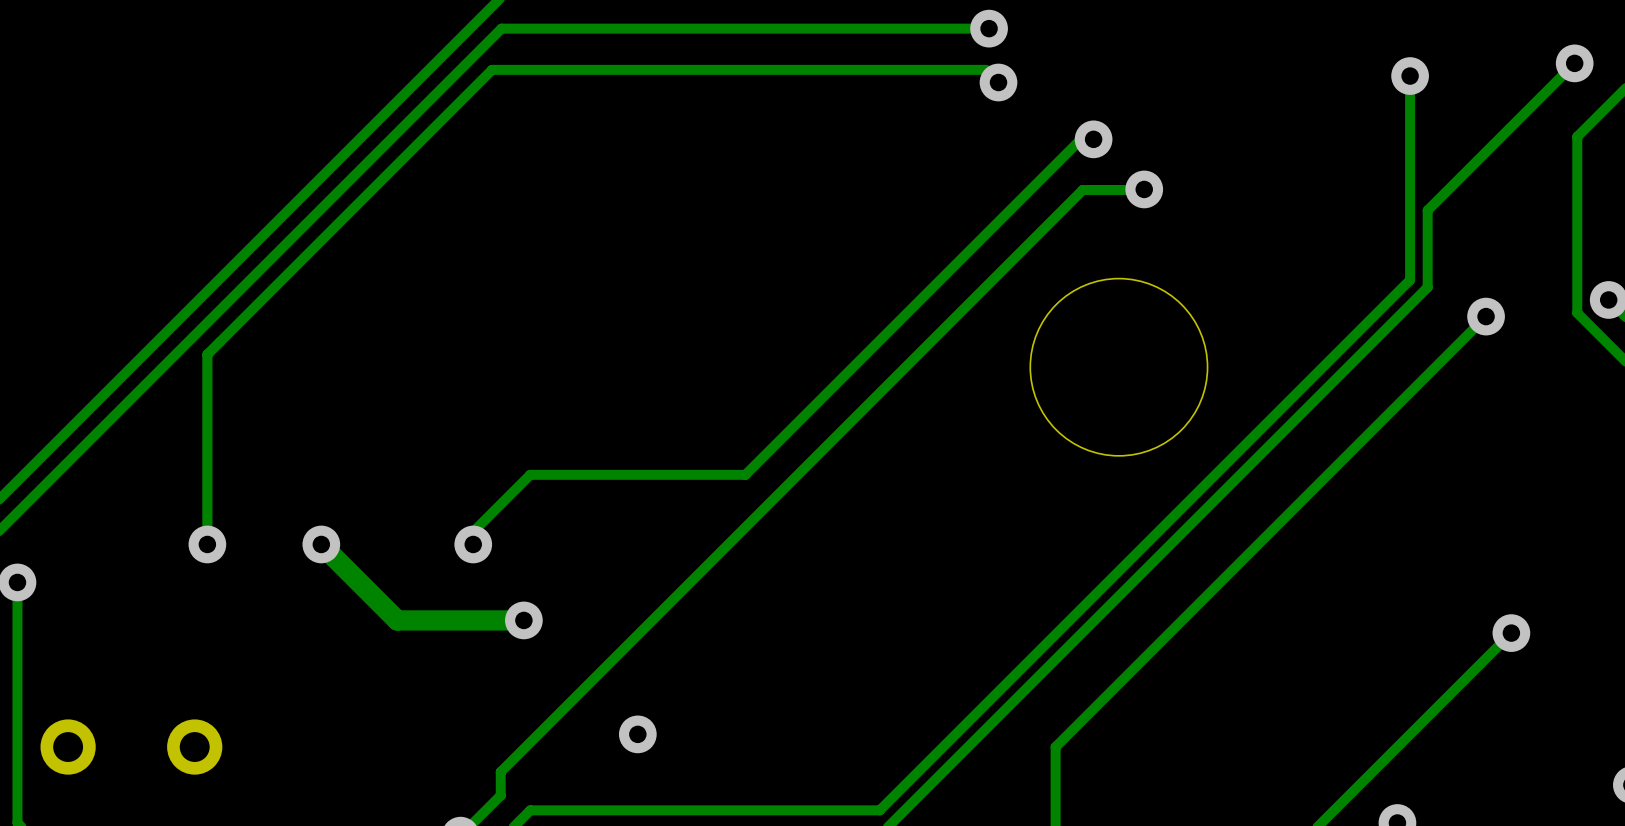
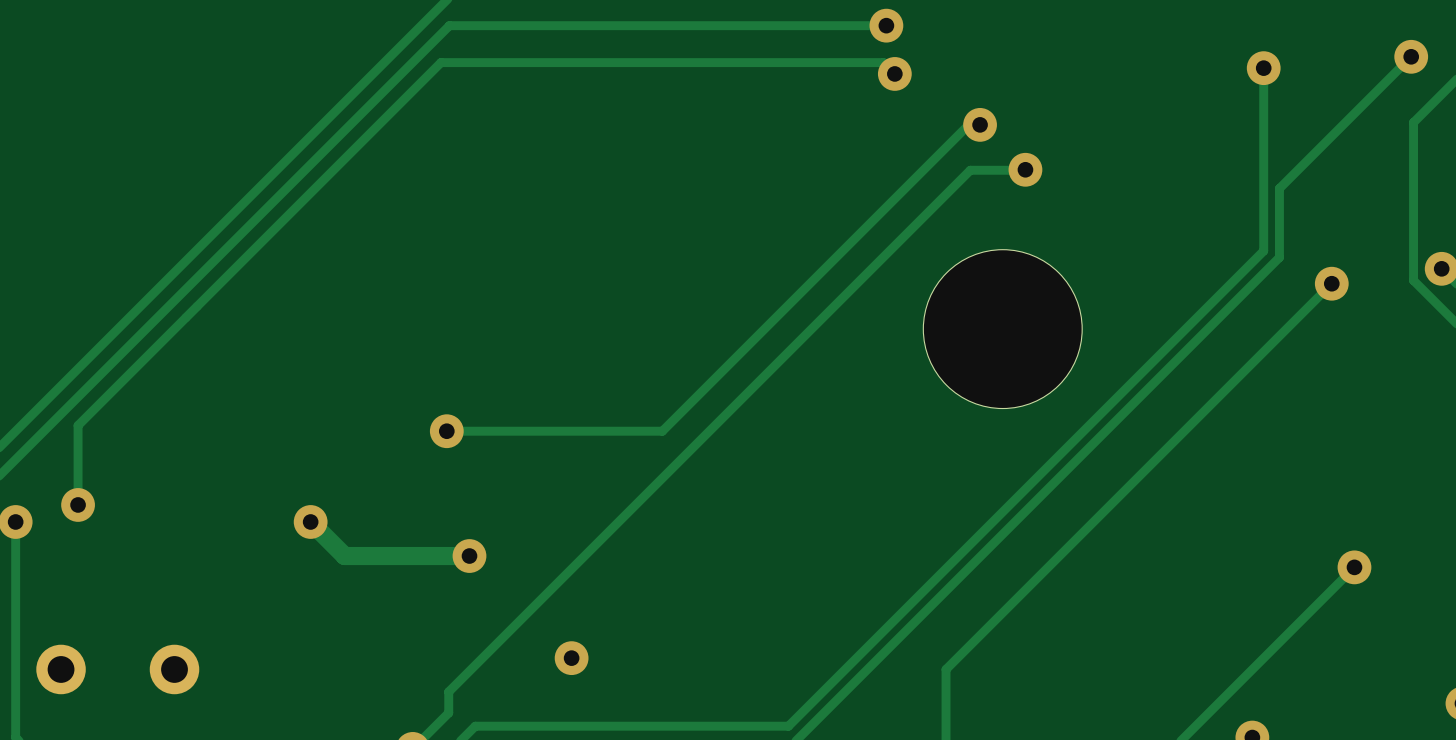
track: (207, 354) (207, 544) -> (185, 317) (78, 425) (78, 504)
track: (745, 474) (530, 474) (473, 531) (473, 544) -> (668, 425) (662, 431) (446, 431)
via: none -> (446, 431)
via: (207, 544) -> none
track: (321, 544) (397, 620) -> (310, 521) (344, 556) (356, 556)
via position: (321, 544) -> (310, 521)
via: (473, 544) -> none
via: none -> (78, 504)

